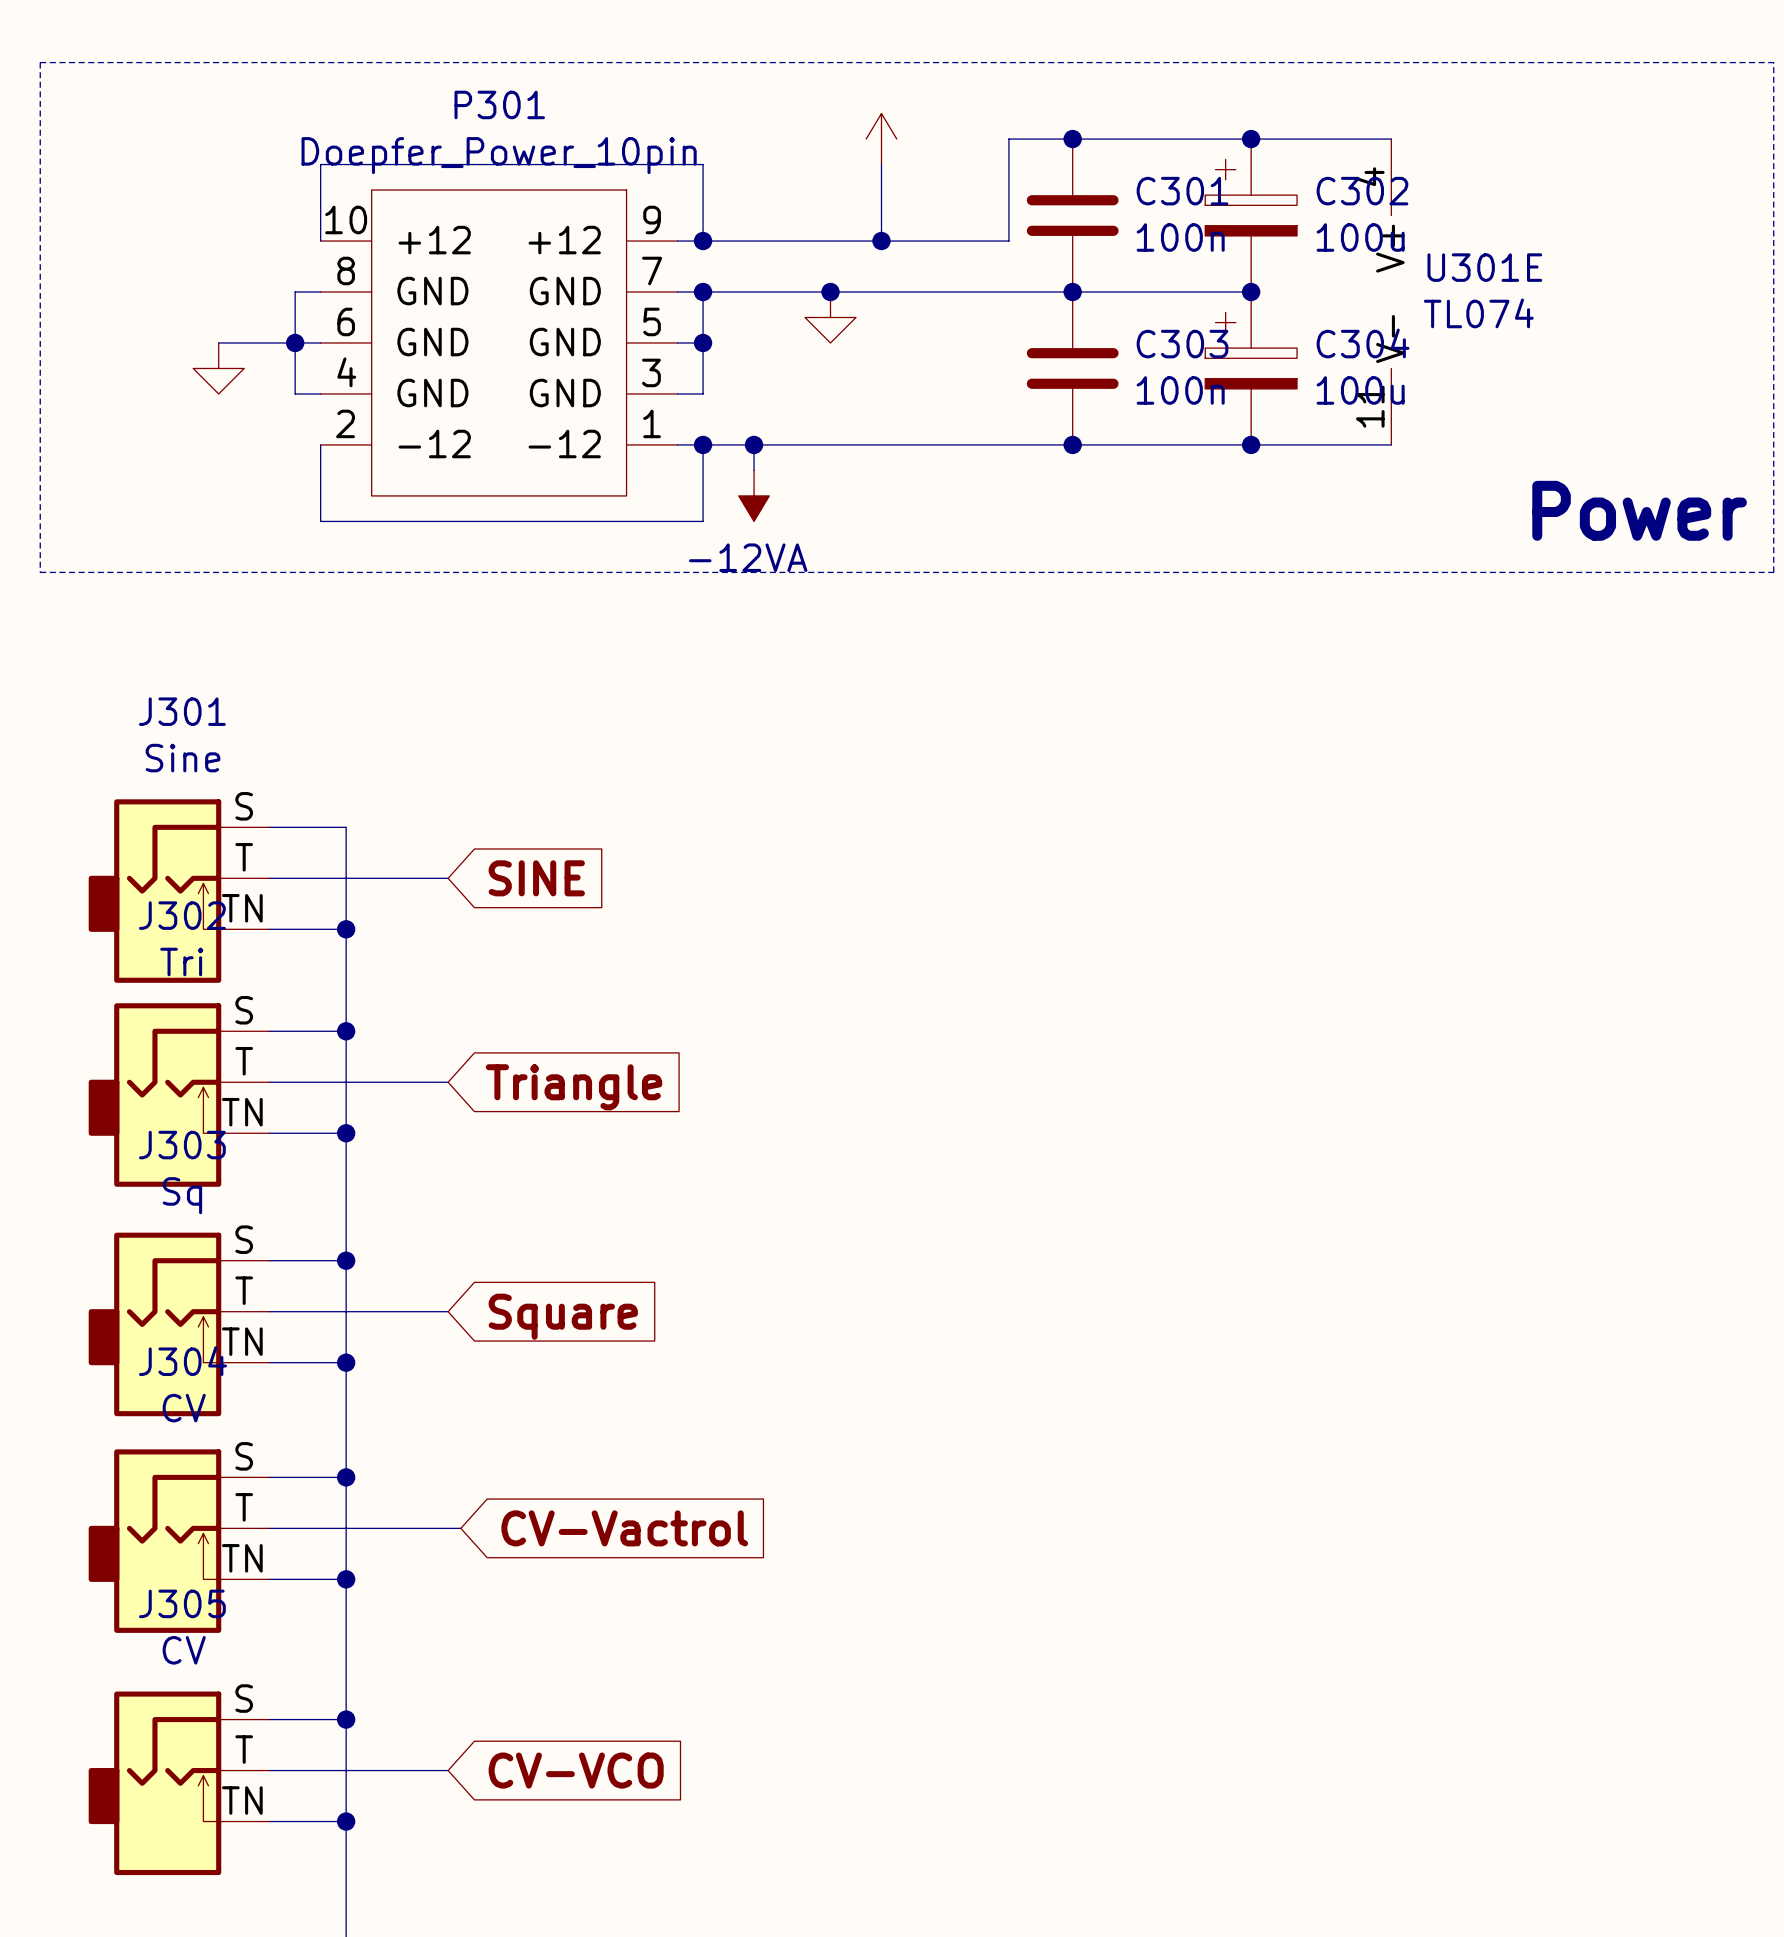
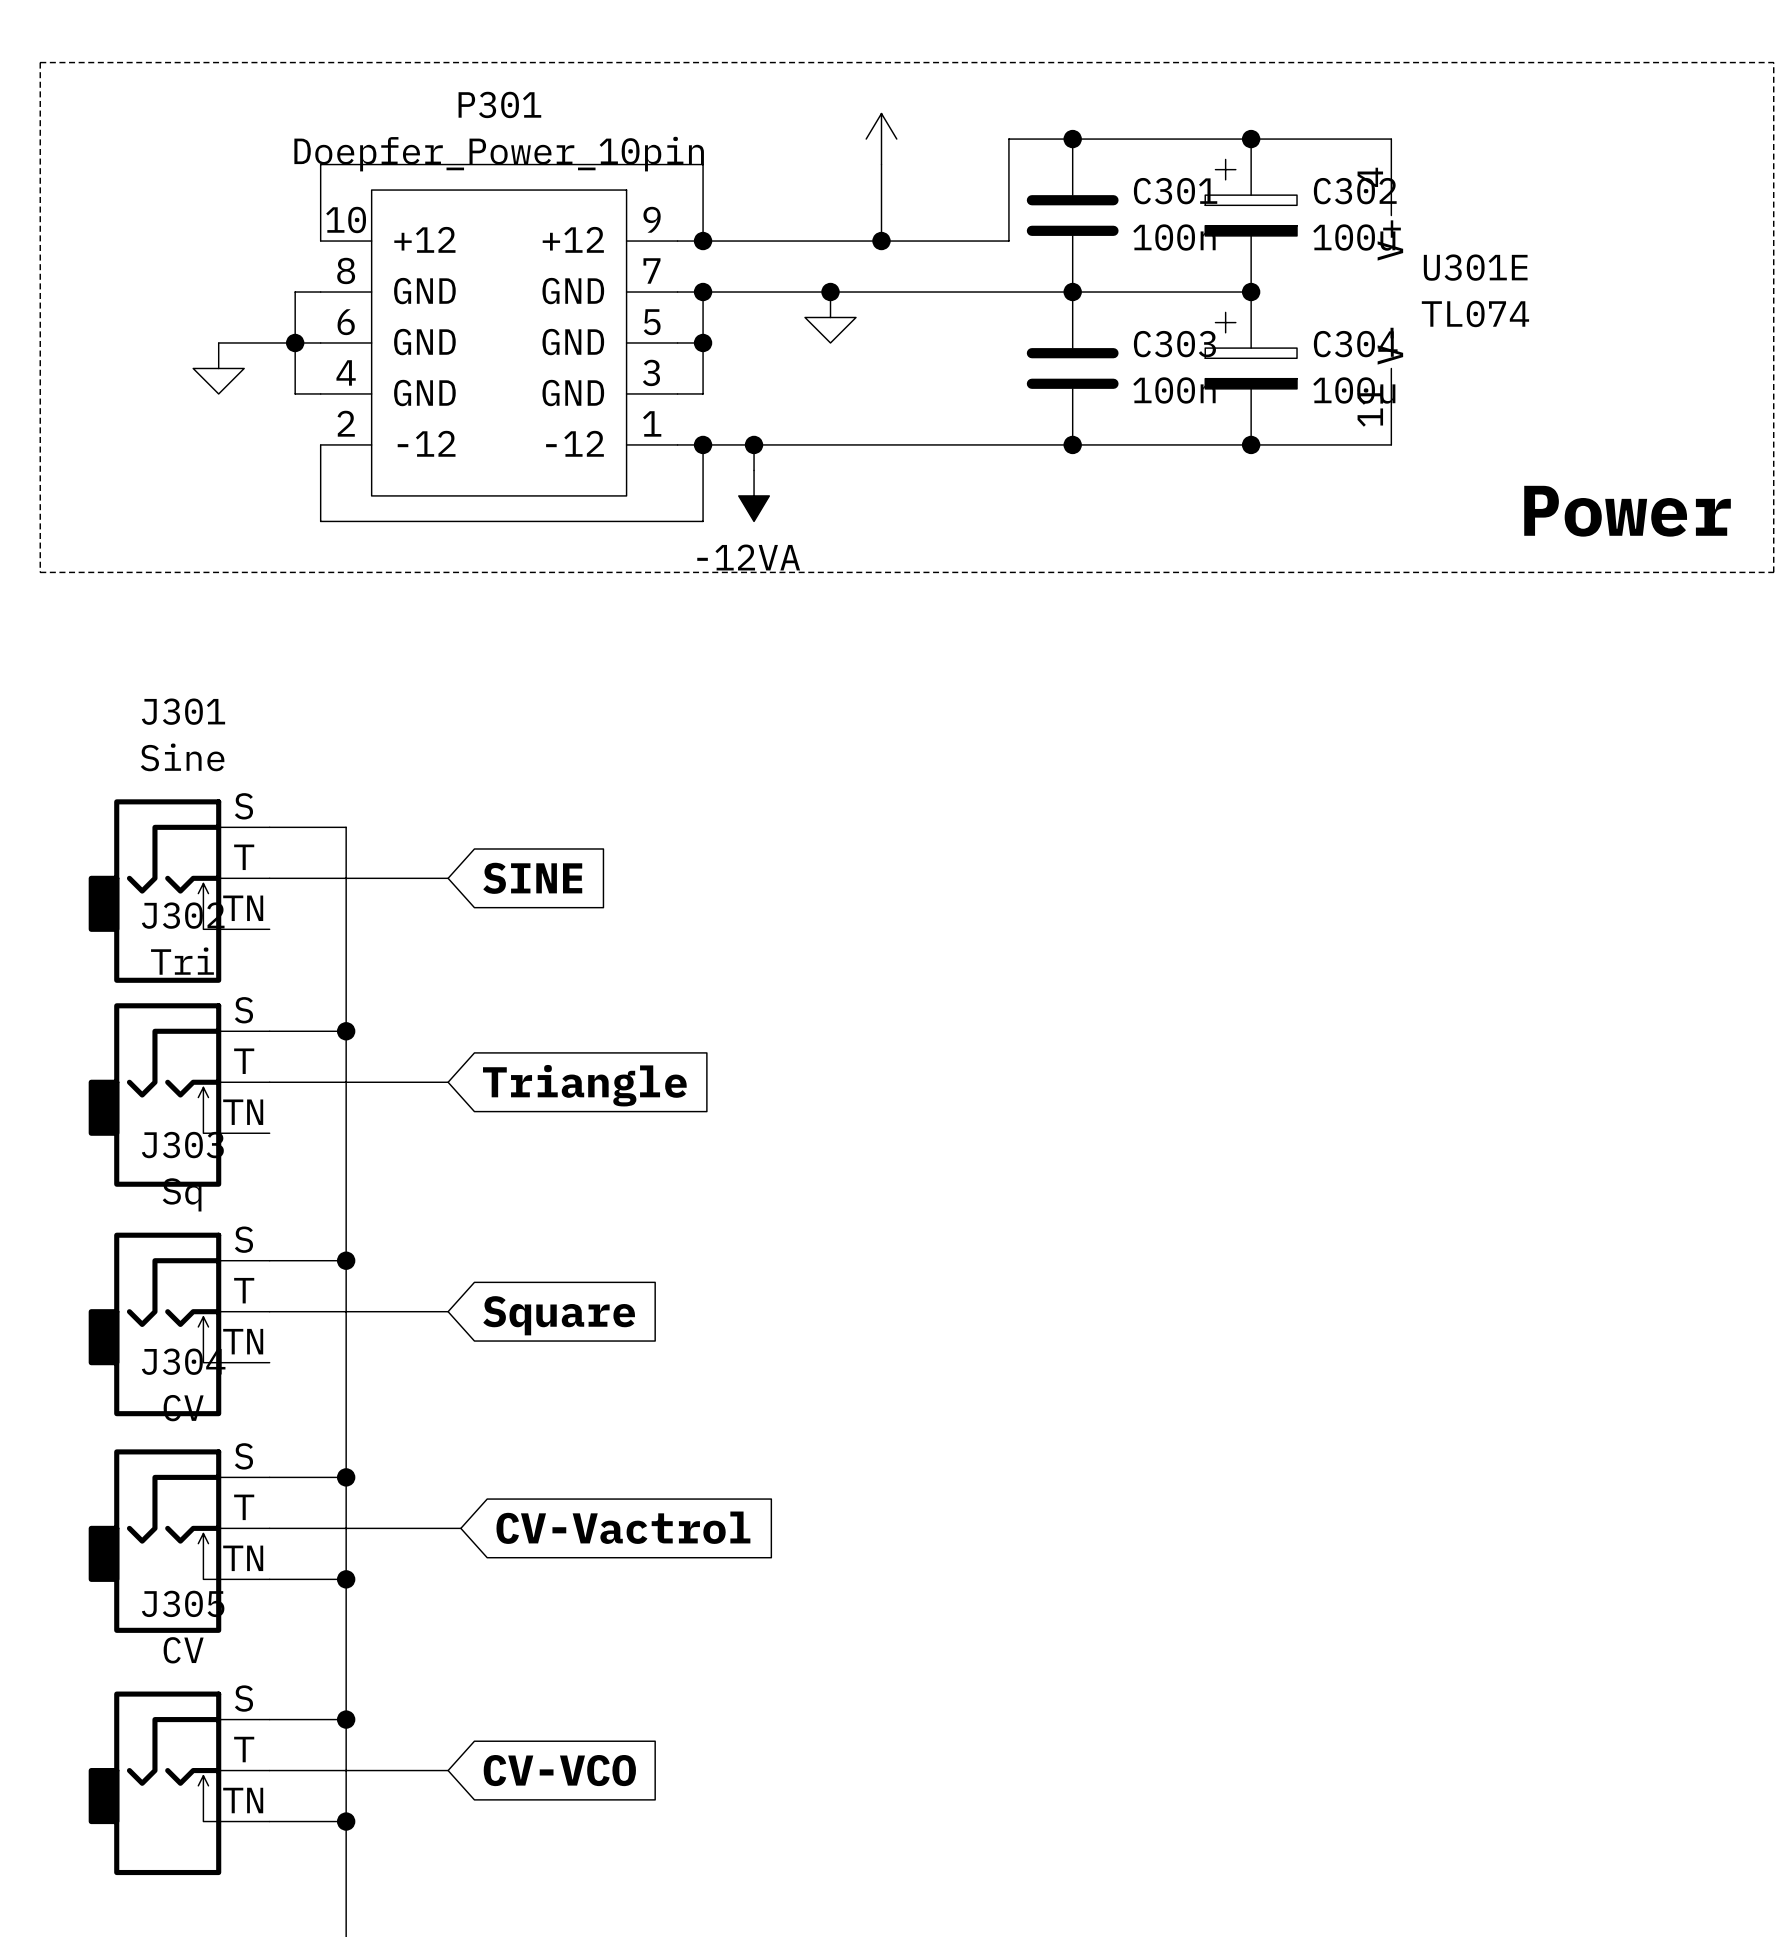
wire: (269, 929) (346, 929) -> none
junction: (346, 929) -> none
wire: (269, 1133) (346, 1133) -> none
junction: (346, 1133) -> none
wire: (269, 1362) (346, 1362) -> none
junction: (346, 1362) -> none

